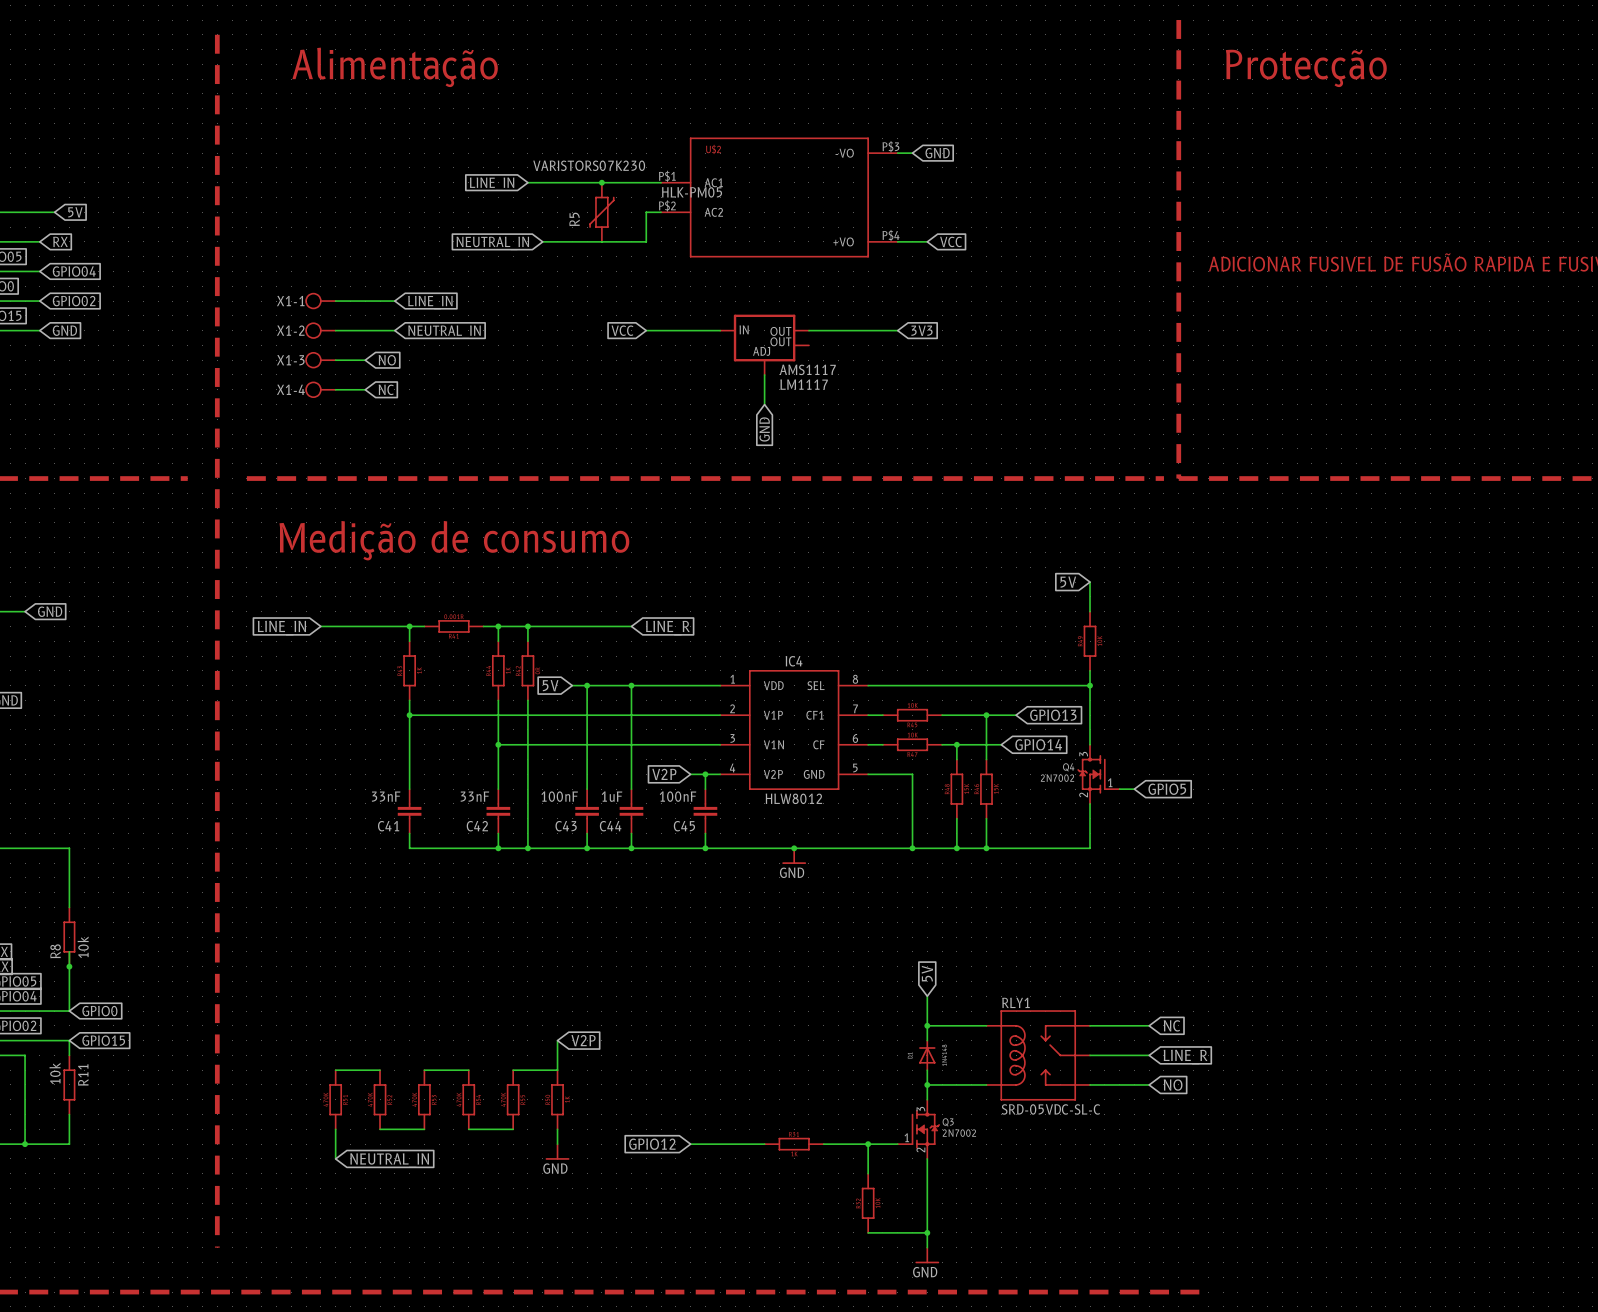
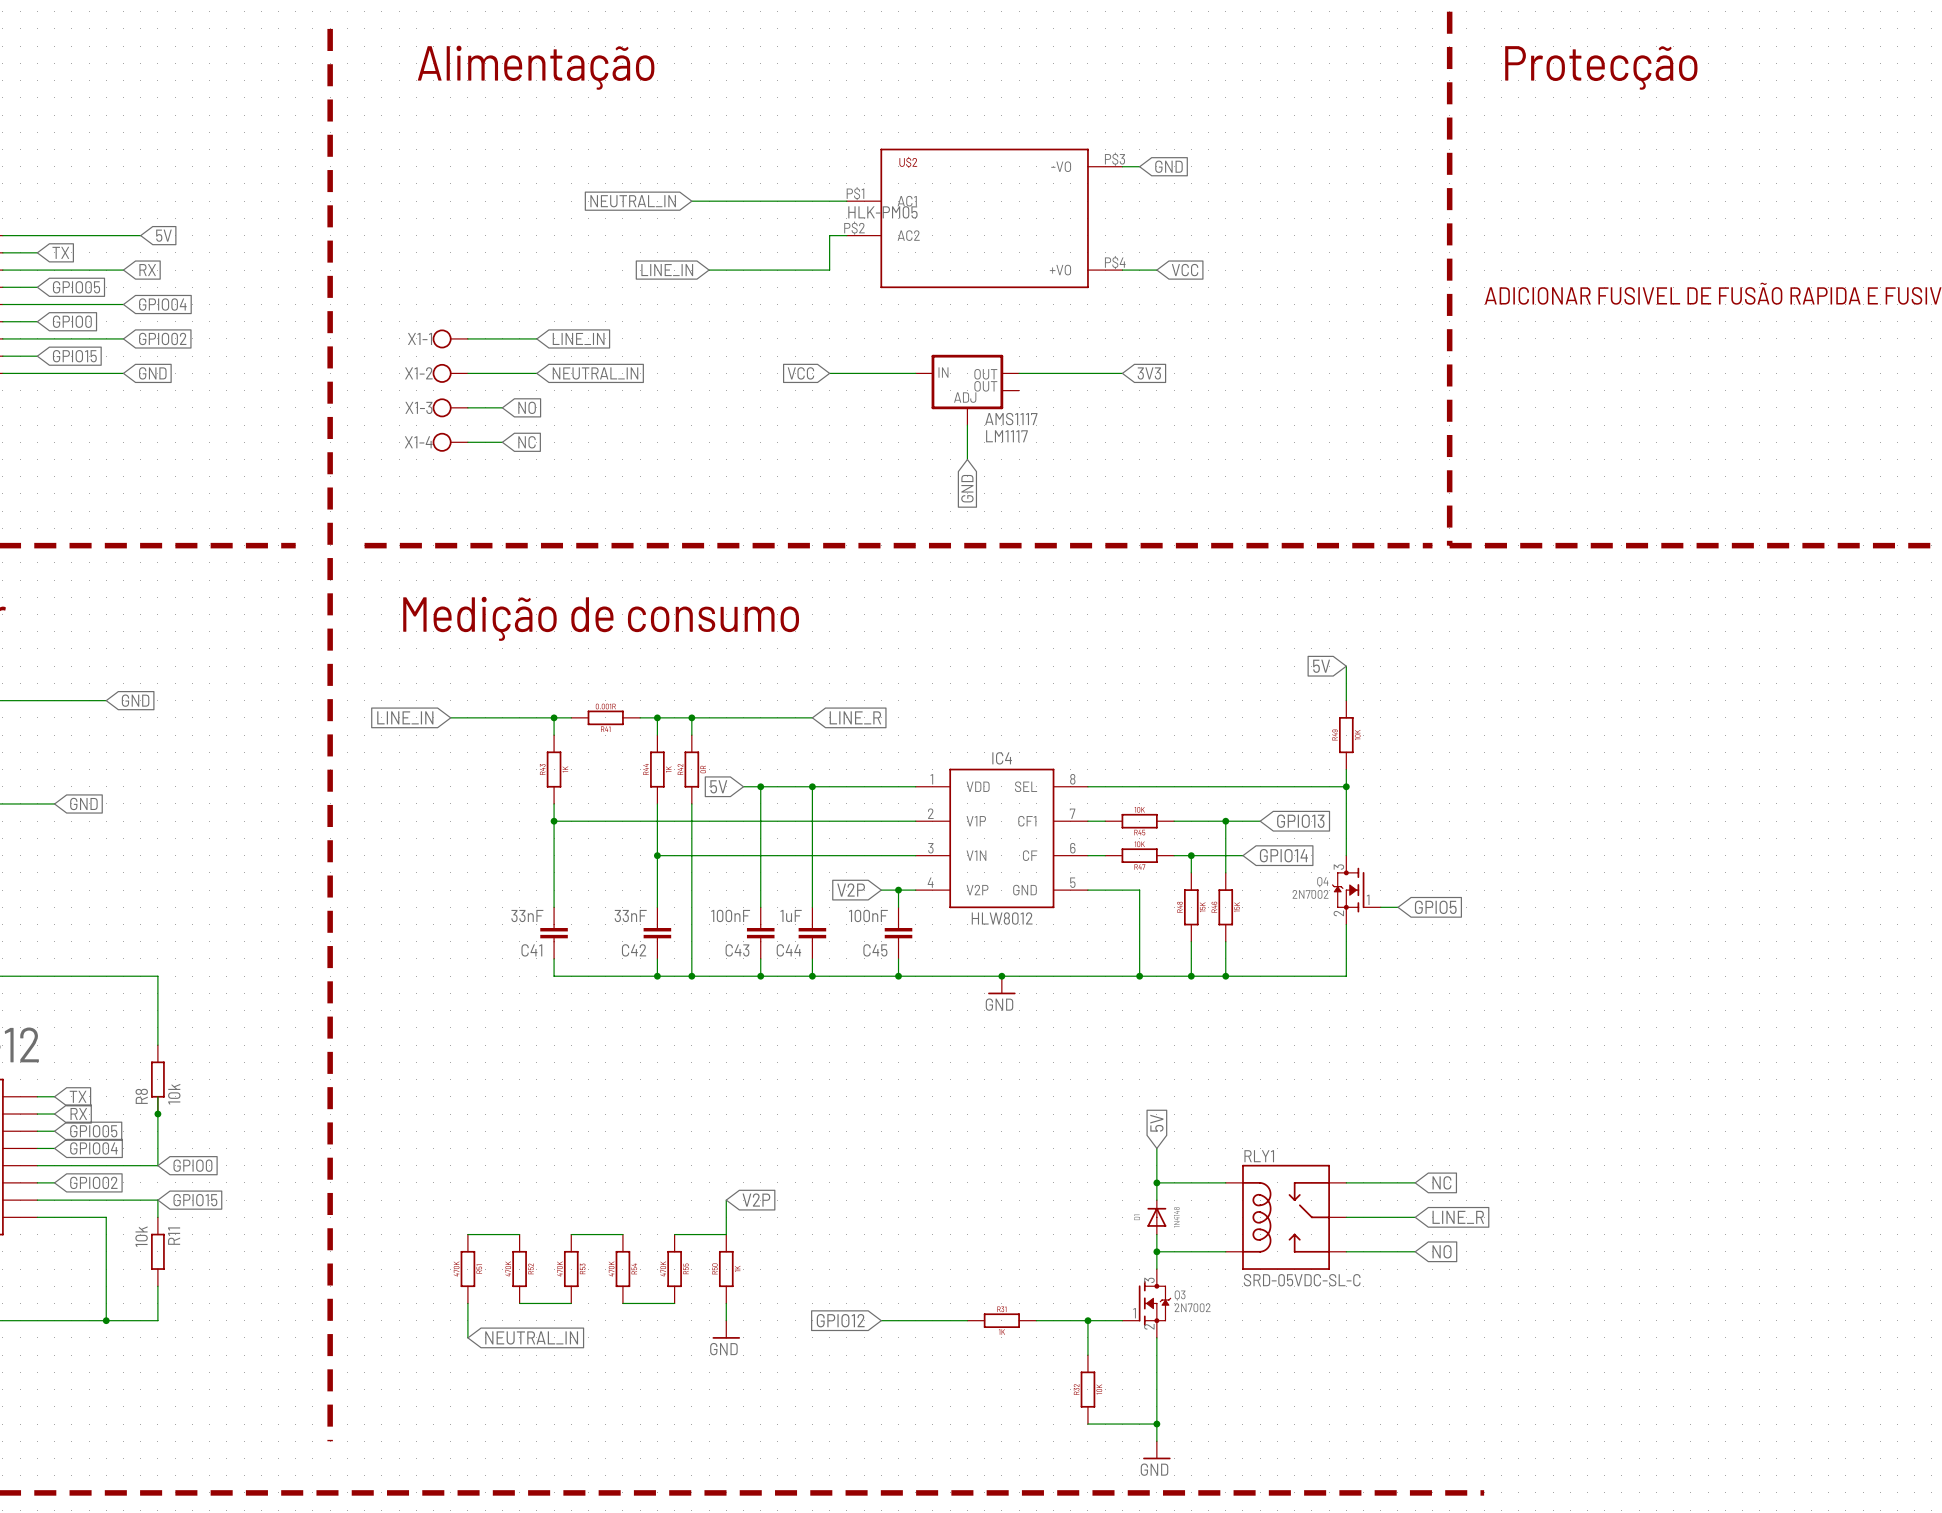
junction: (601, 182) -> none
global label: LINE_IN (492, 184) -> NEUTRAL_IN (633, 201)
R5: VARISTORS07K230 (601, 212) -> none
global label: NEUTRAL_IN (492, 243) -> LINE_IN (667, 270)

